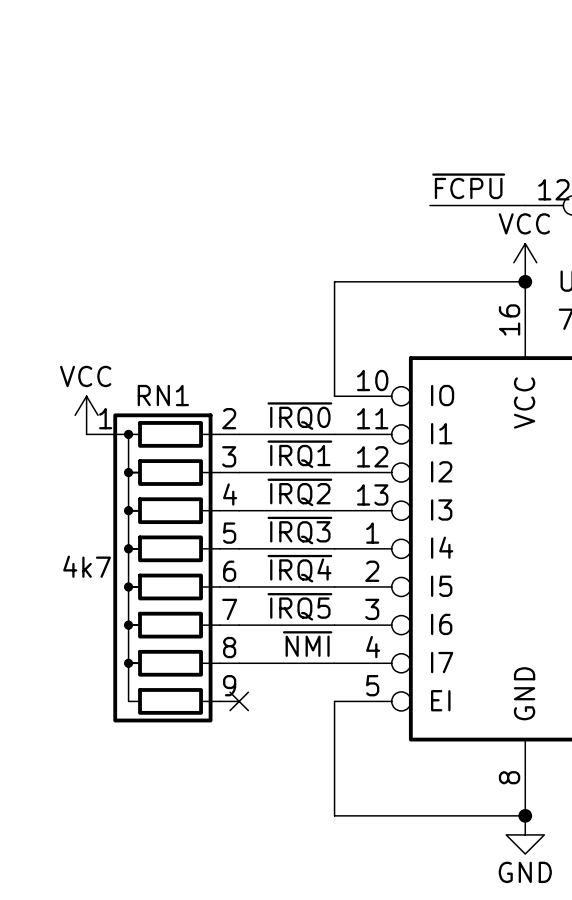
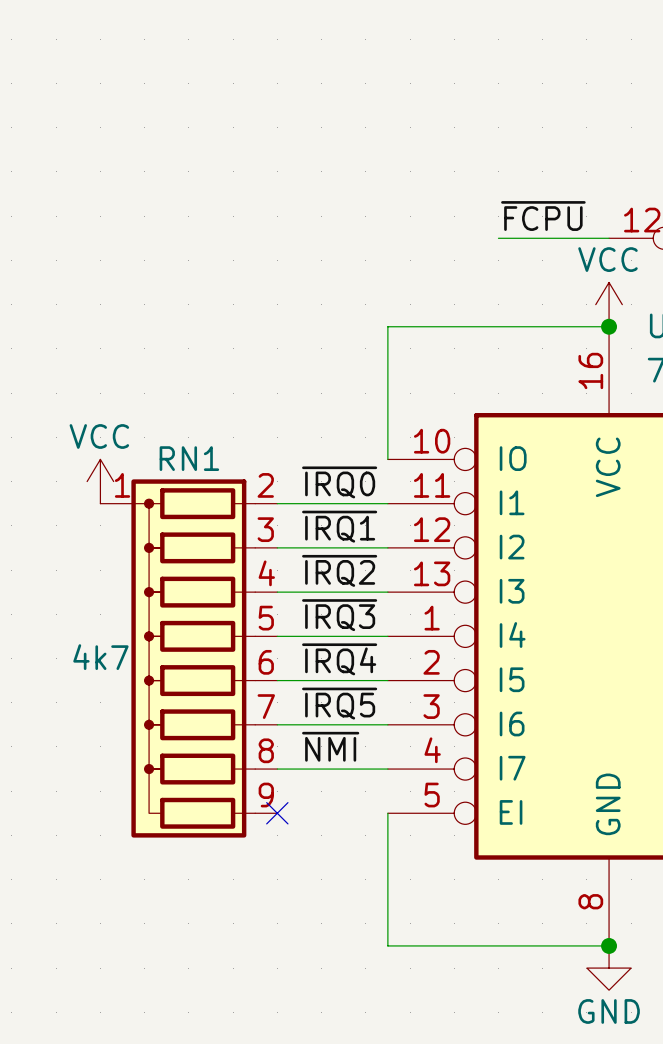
label position: ~{IRQ0} (299, 416) -> ~{IRQ0} (339, 482)
label position: ~{IRQ1} (299, 454) -> ~{IRQ1} (339, 526)
label position: ~{IRQ2} (299, 492) -> ~{IRQ2} (339, 570)
label position: ~{IRQ3} (299, 530) -> ~{IRQ3} (339, 615)
label position: ~{IRQ4} (299, 568) -> ~{IRQ4} (339, 659)
label position: ~{IRQ5} (299, 606) -> ~{IRQ5} (339, 703)
label position: ~{NMI} (307, 644) -> ~{NMI} (330, 746)

